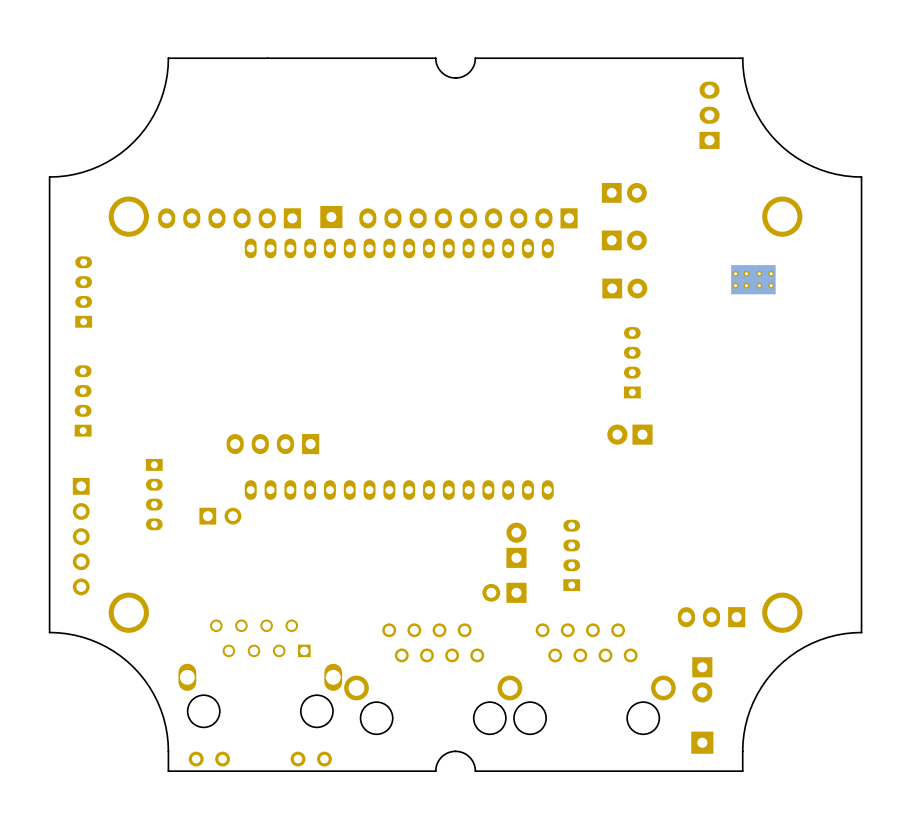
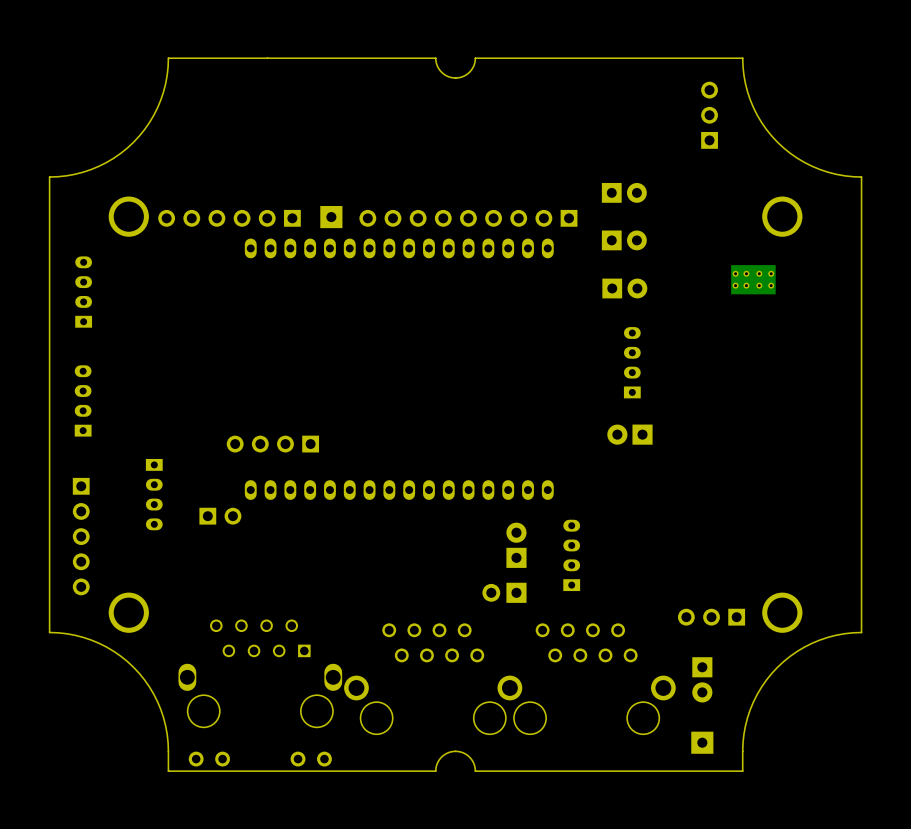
part footprint: [699, 81, 720, 149] -> [701, 81, 718, 149]
part footprint: [158, 208, 301, 229] -> [158, 209, 301, 227]
part footprint: [359, 208, 578, 229] -> [359, 209, 578, 227]
part footprint: [226, 433, 320, 455] -> [226, 435, 320, 453]
part footprint: [677, 607, 746, 628] -> [677, 608, 746, 626]

